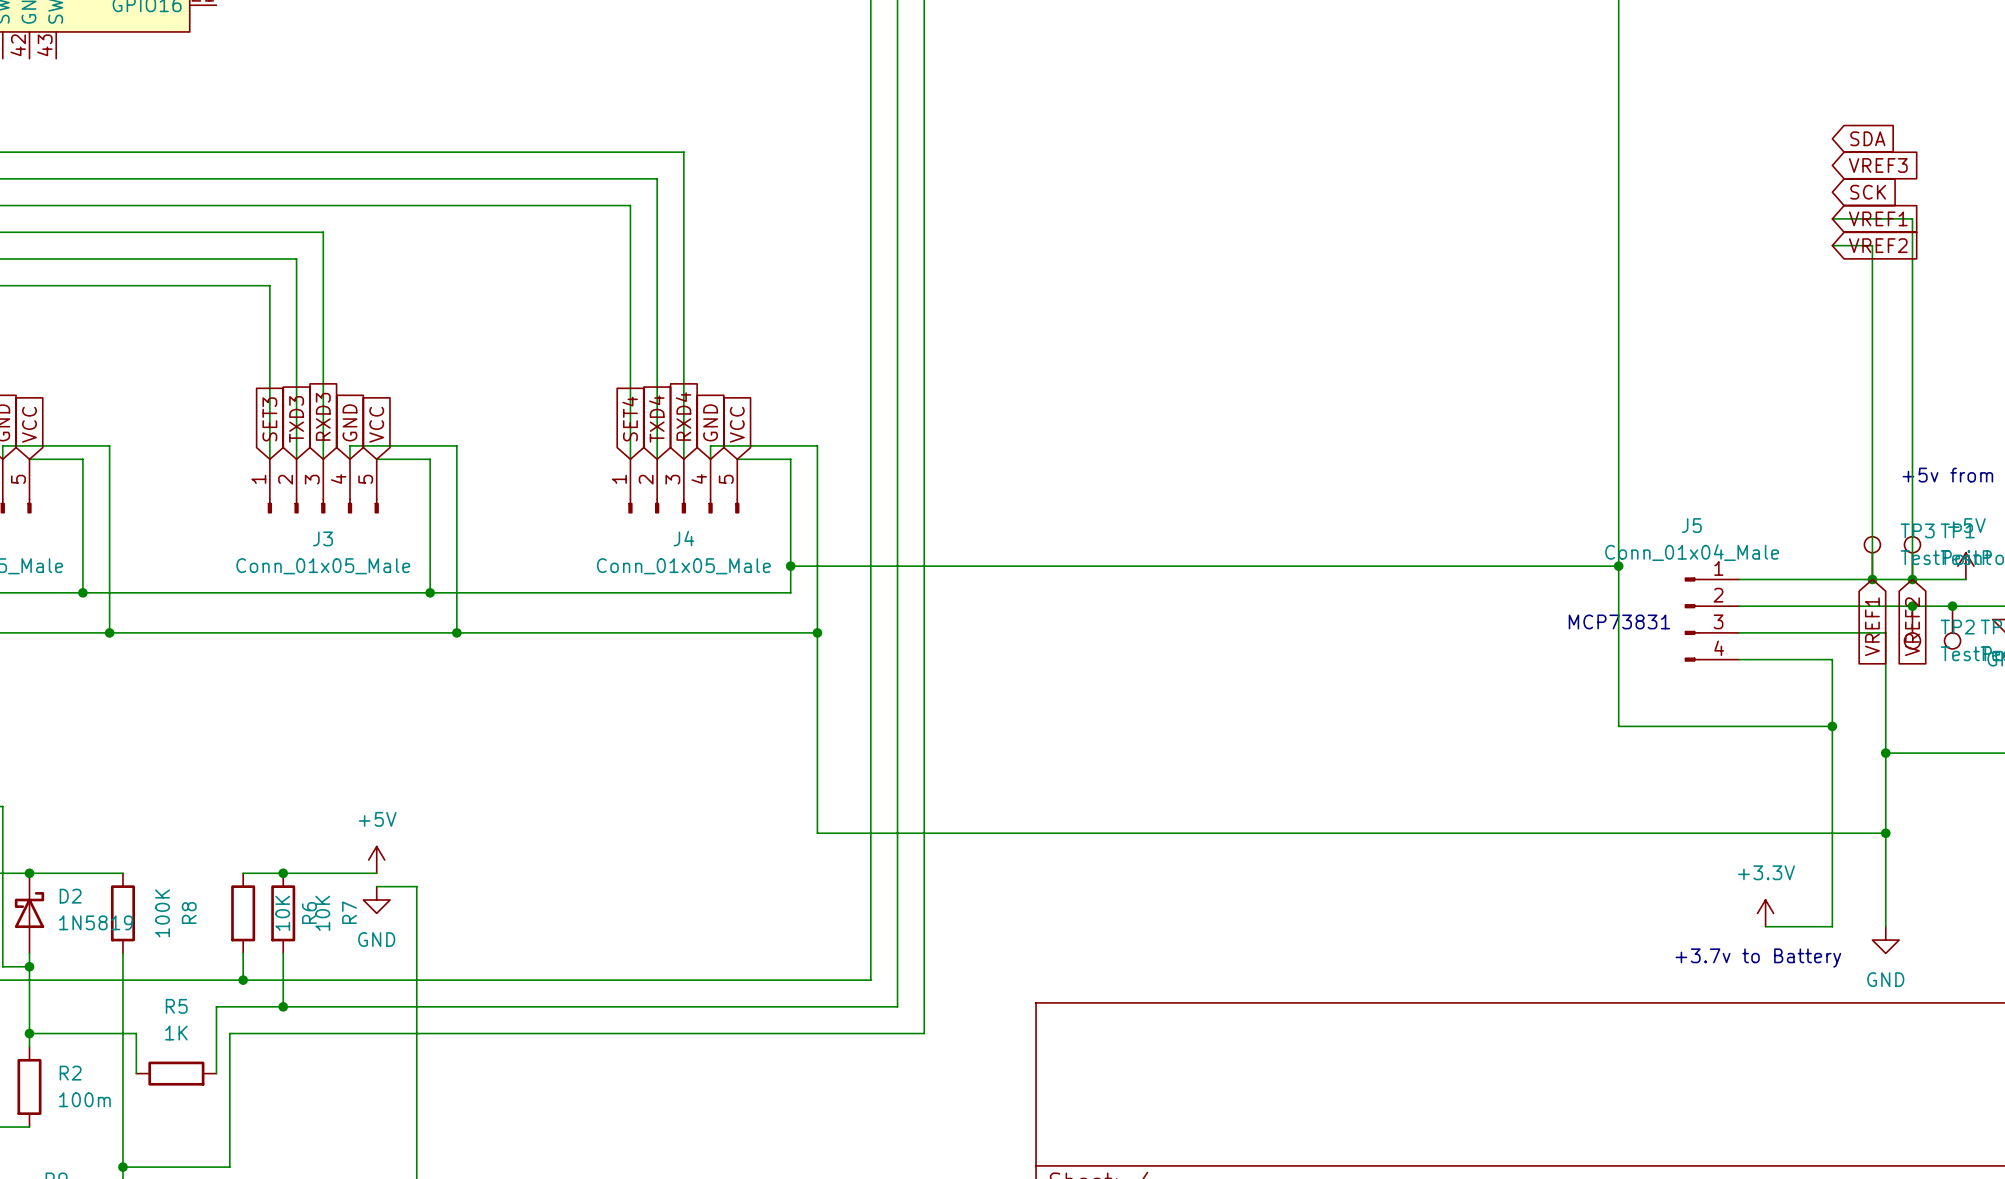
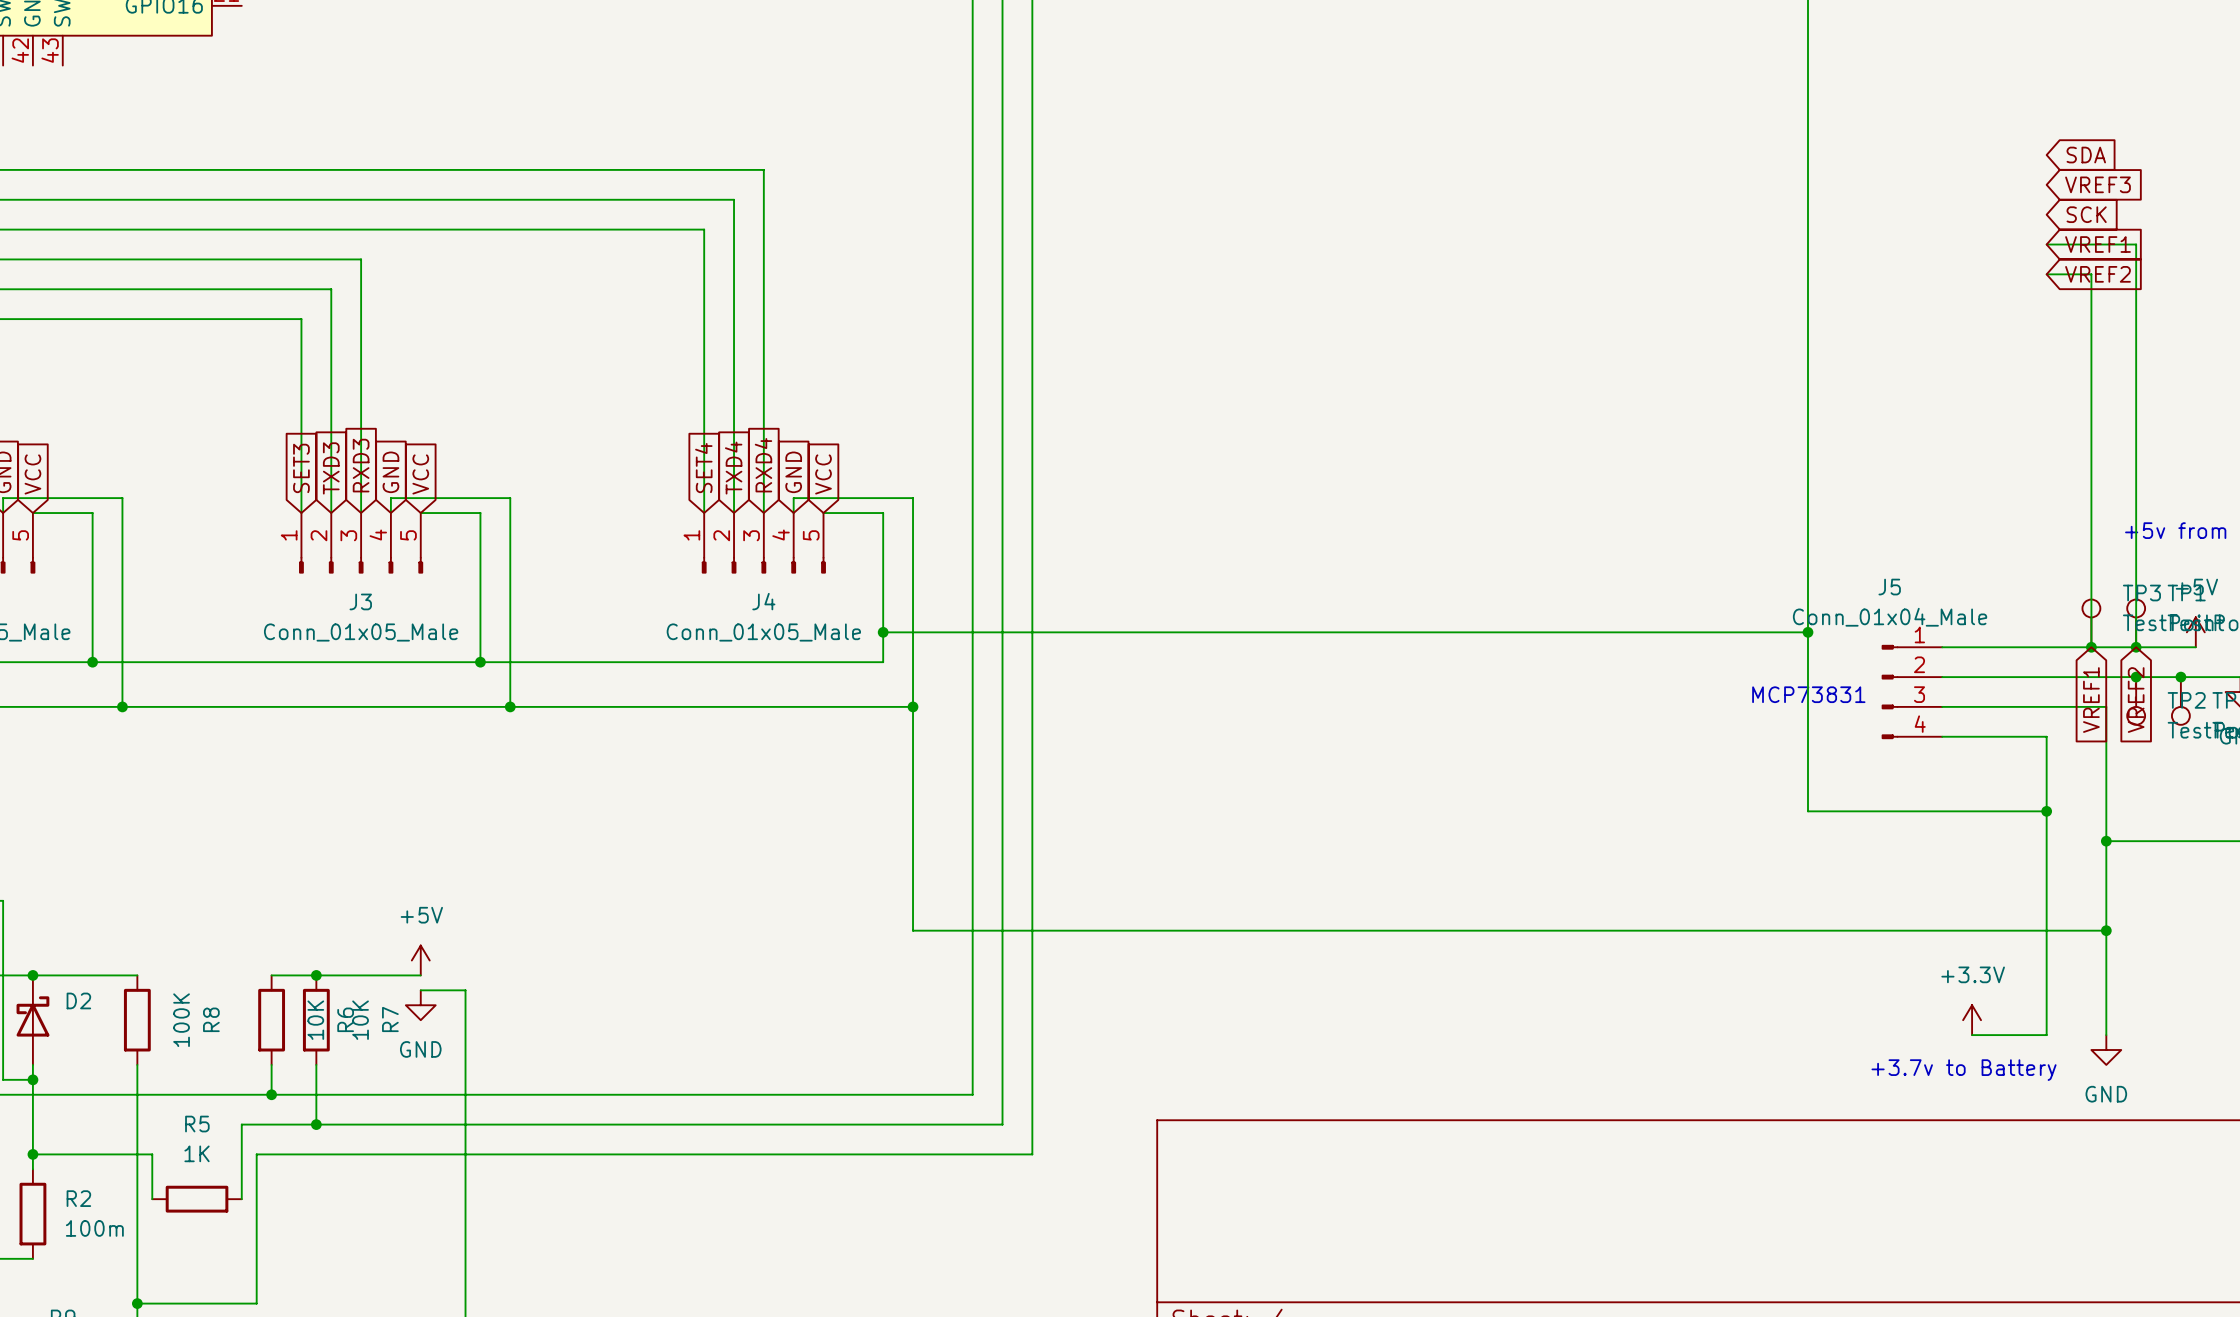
D2 value: 1N5819 (96, 922) -> none

